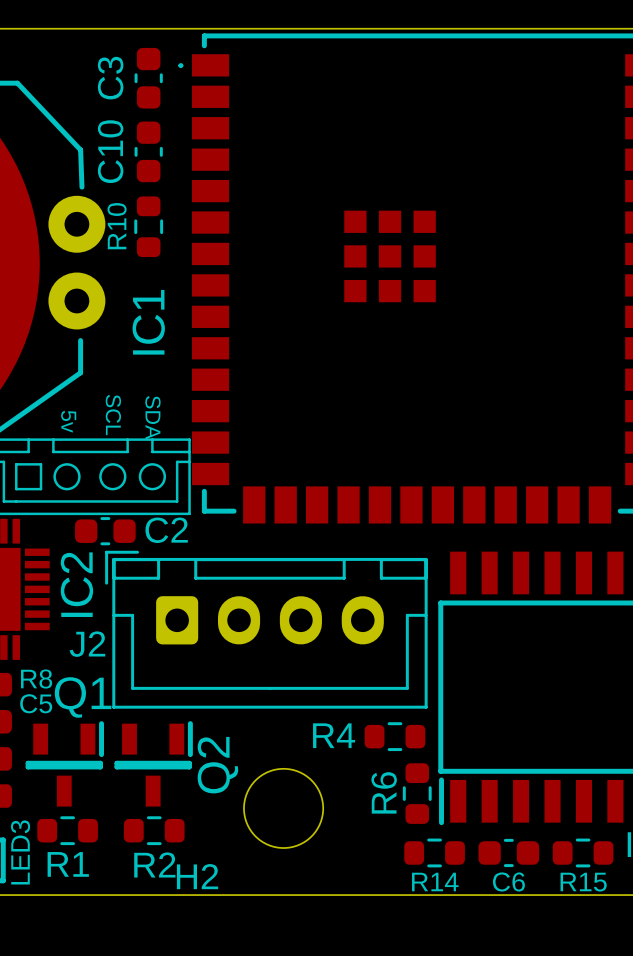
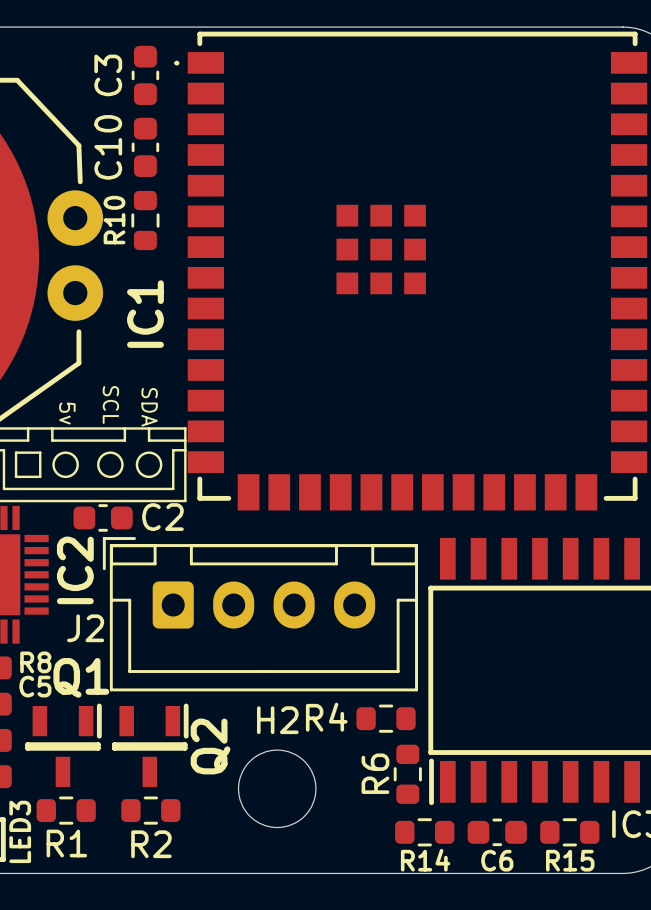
H2 name position: H2 (197, 876) -> H2 (277, 720)

